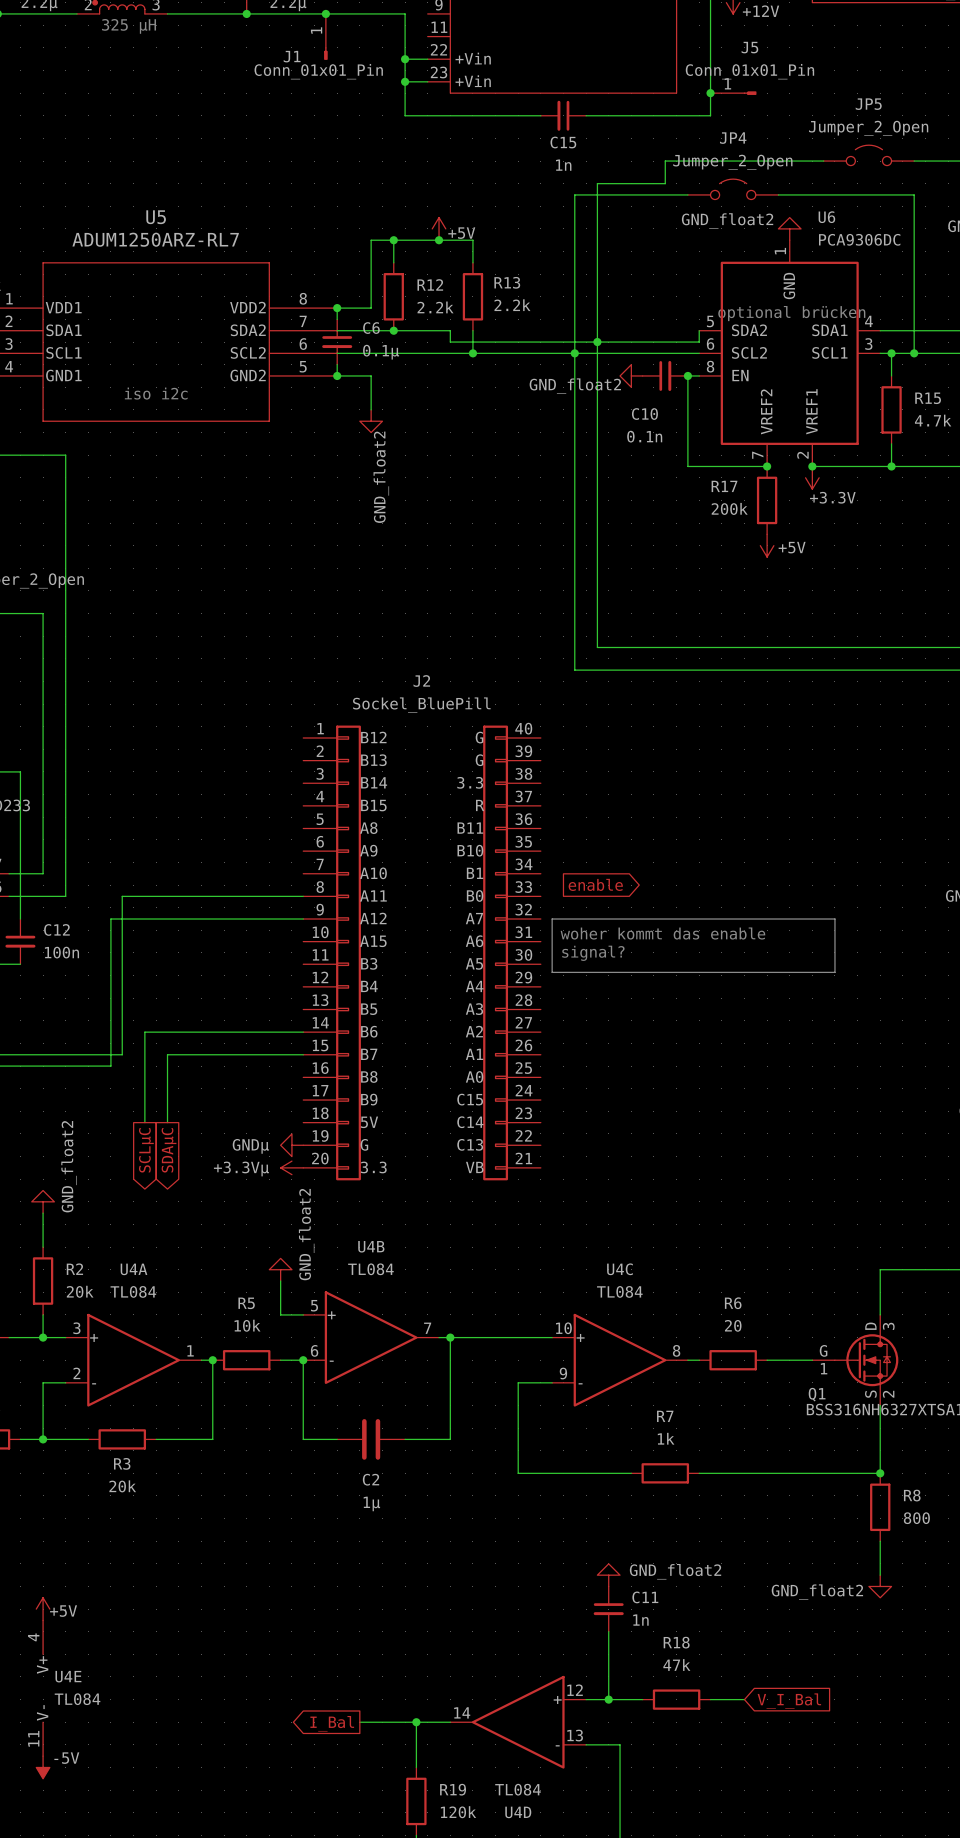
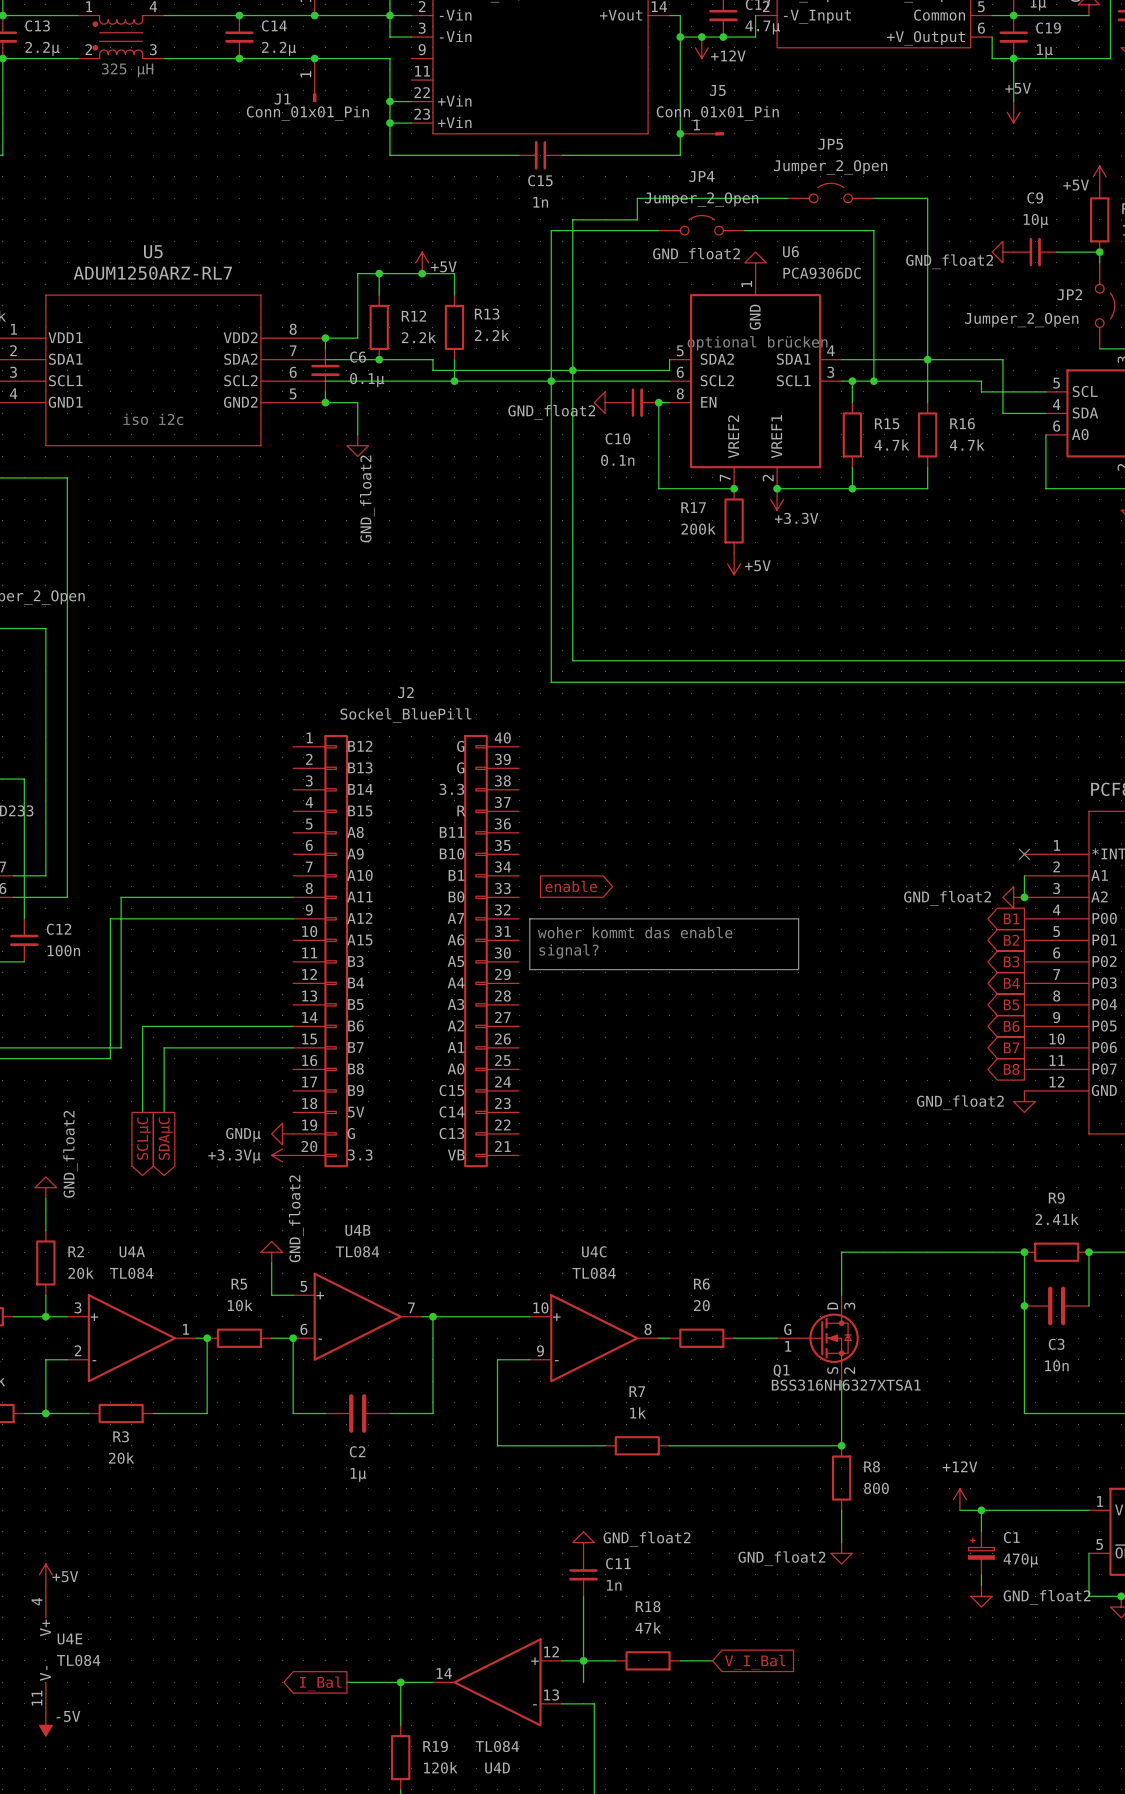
wire: none -> (583, 1660) (583, 1682)

